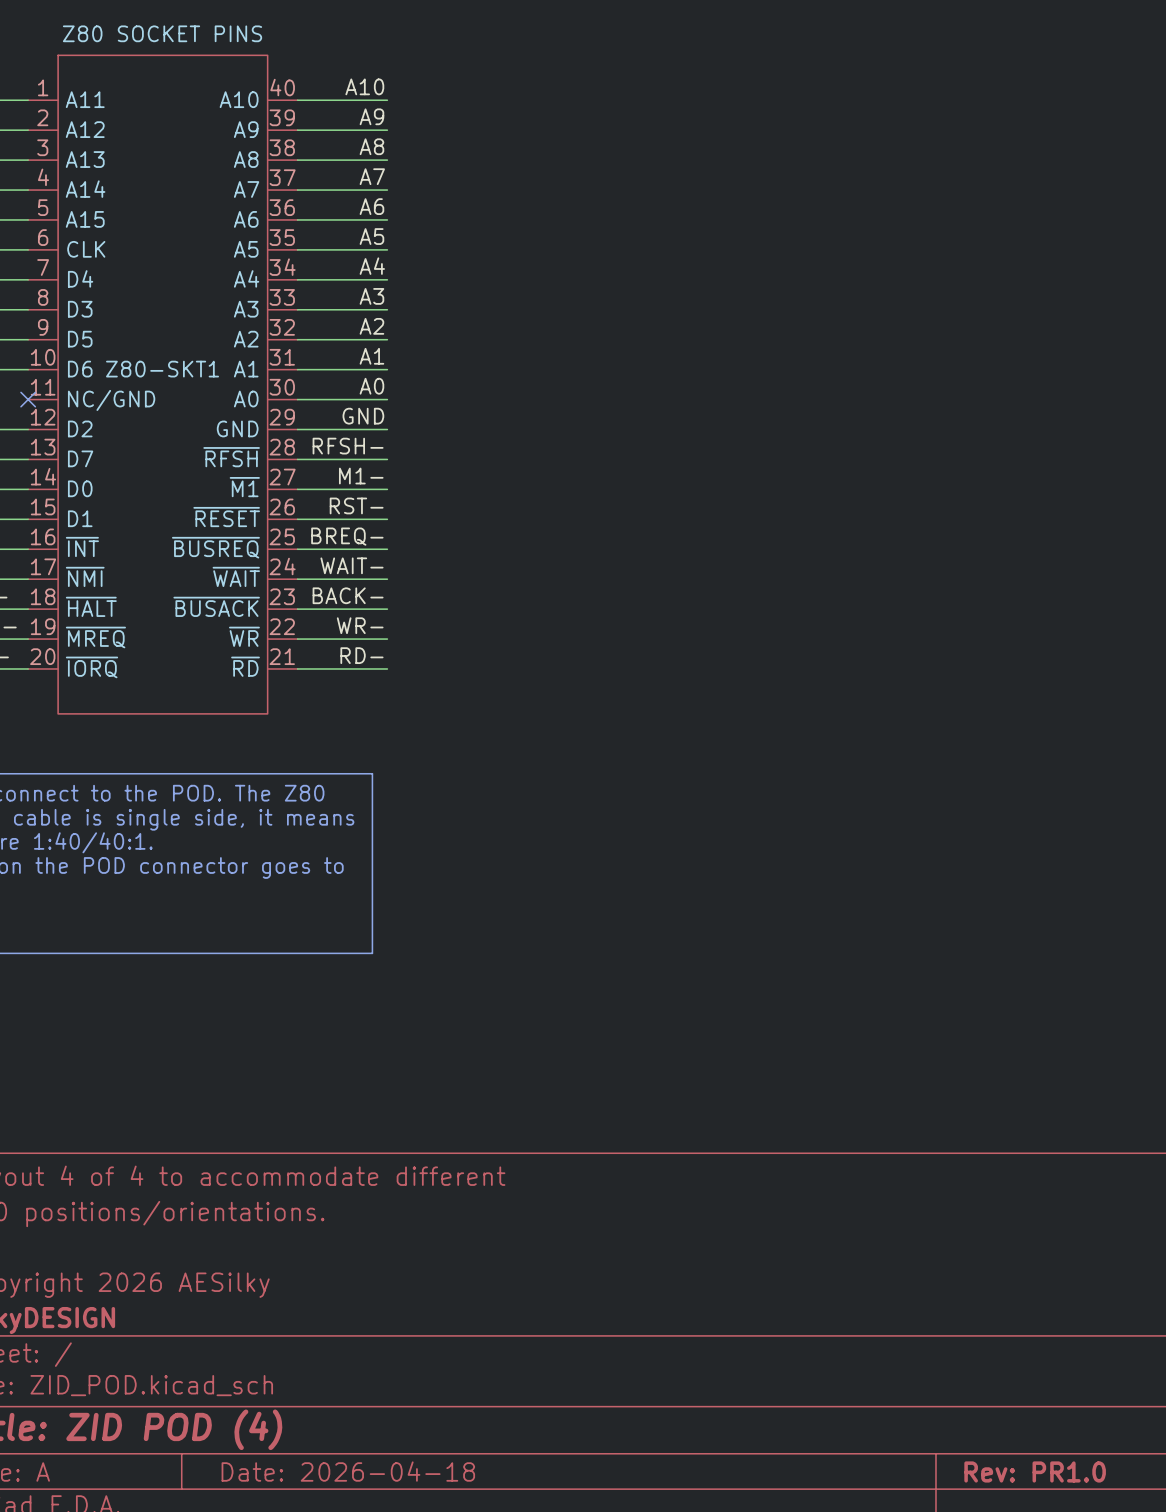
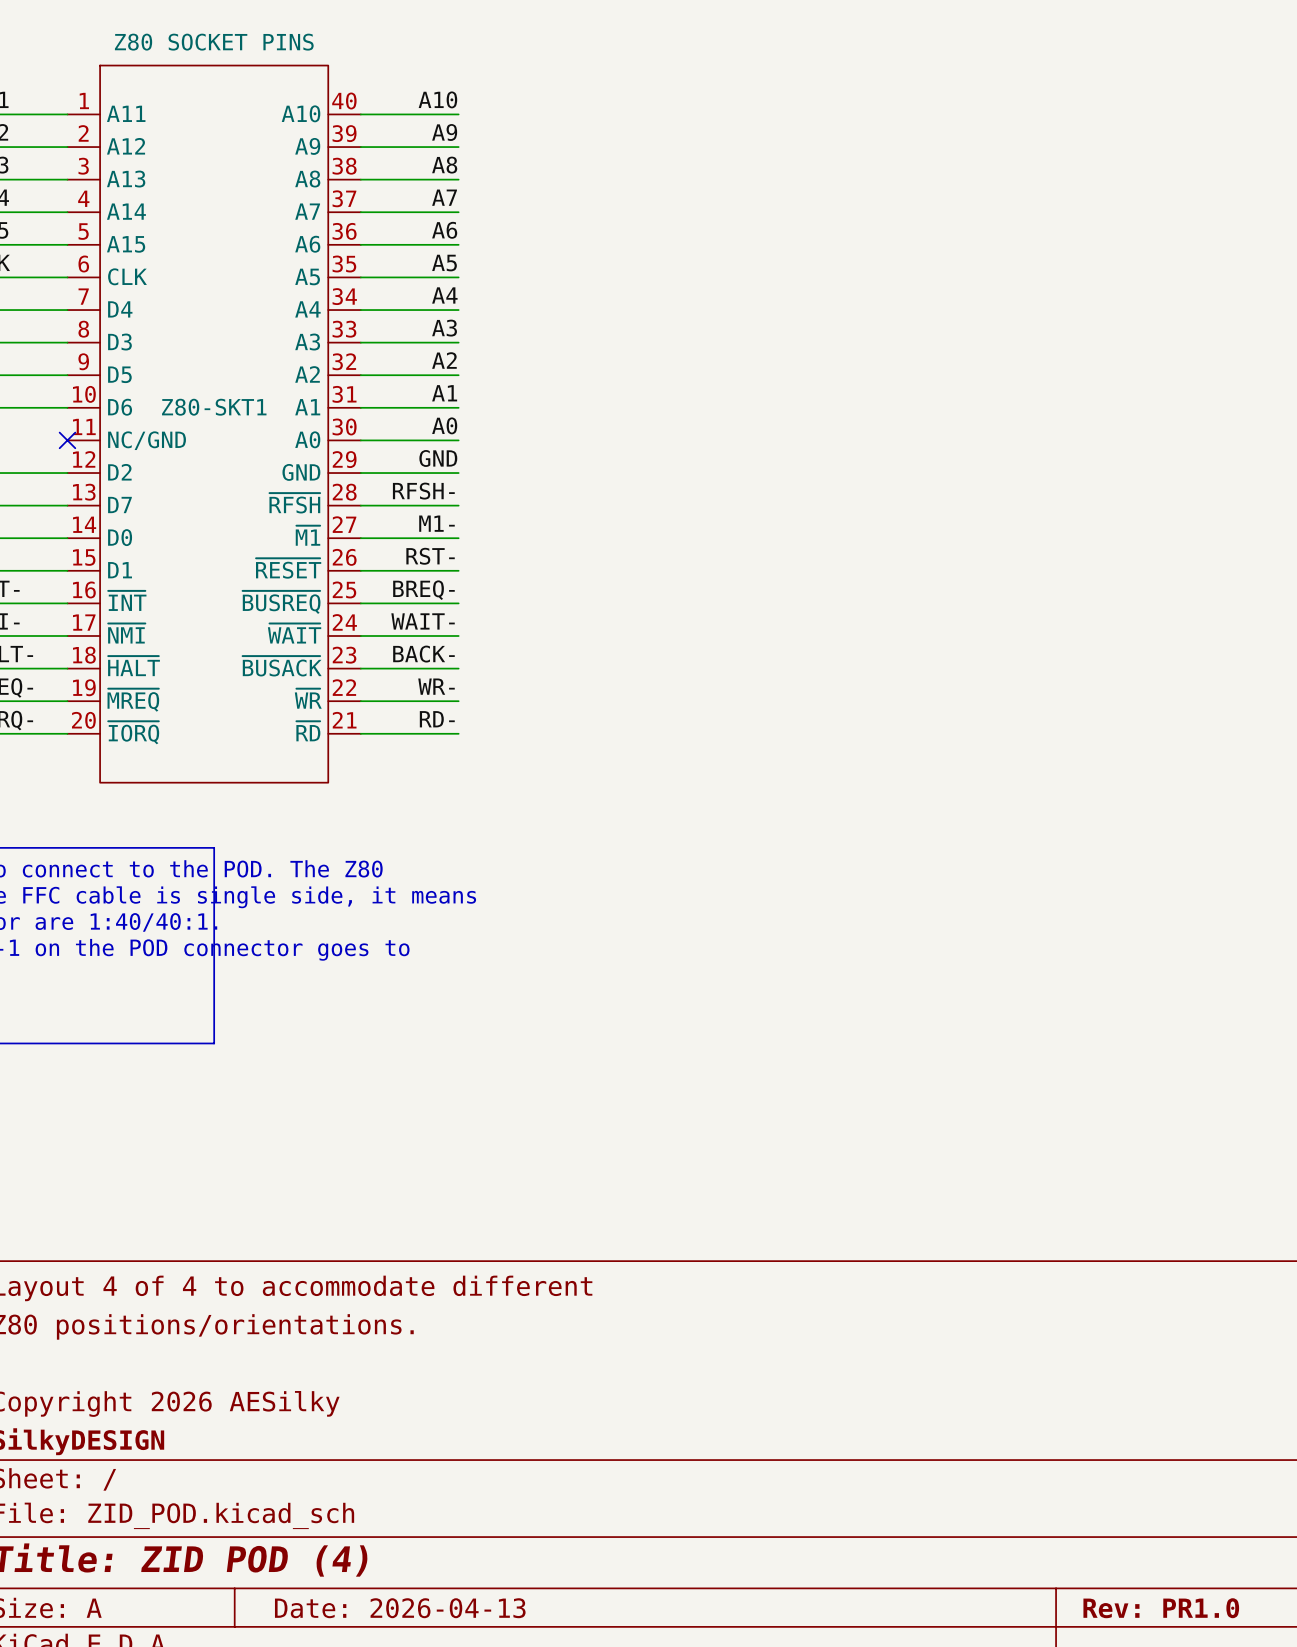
line: (162, 773) (372, 773) (372, 953) (162, 953) -> (214, 847) (214, 1043)
title block: Date: 2026-04-18 (348, 1471) -> Date: 2026-04-13 (400, 1608)

